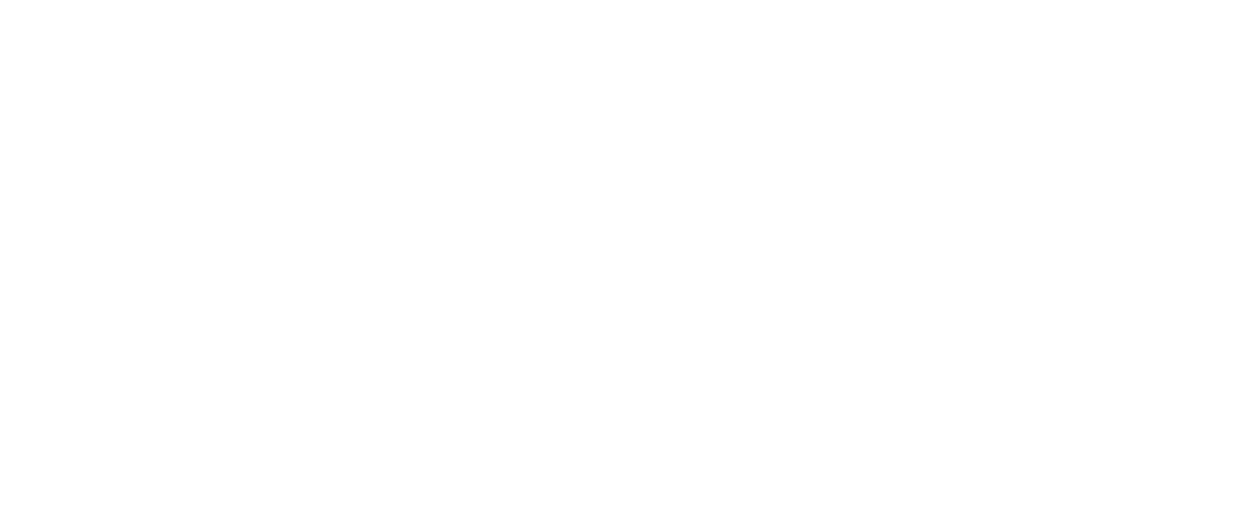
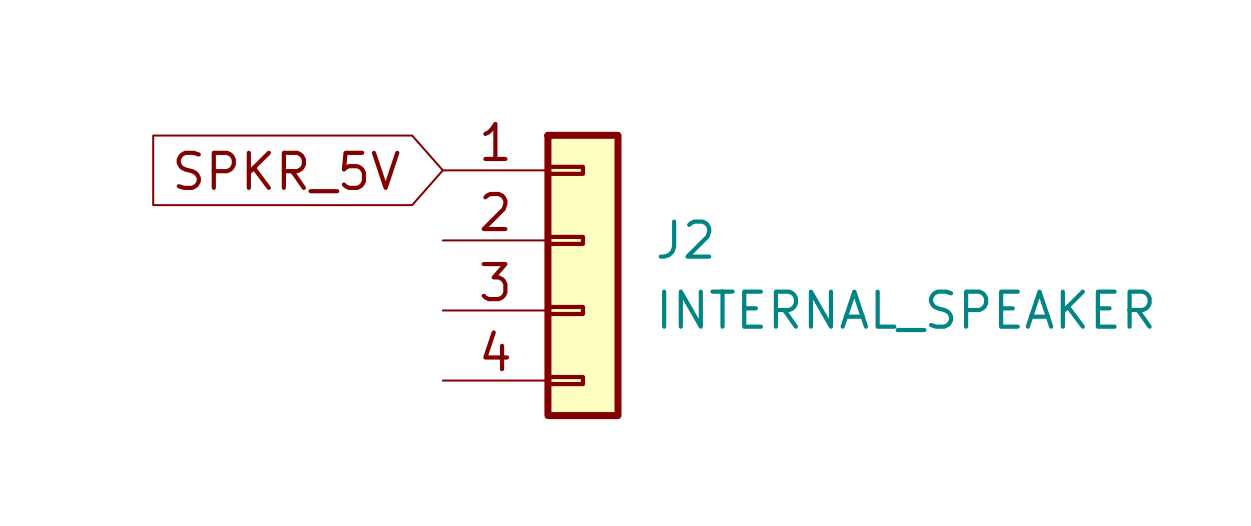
global label: none -> SPKR_5V (288, 172)
J2: none -> INTERNAL_SPEAKER (532, 275)

